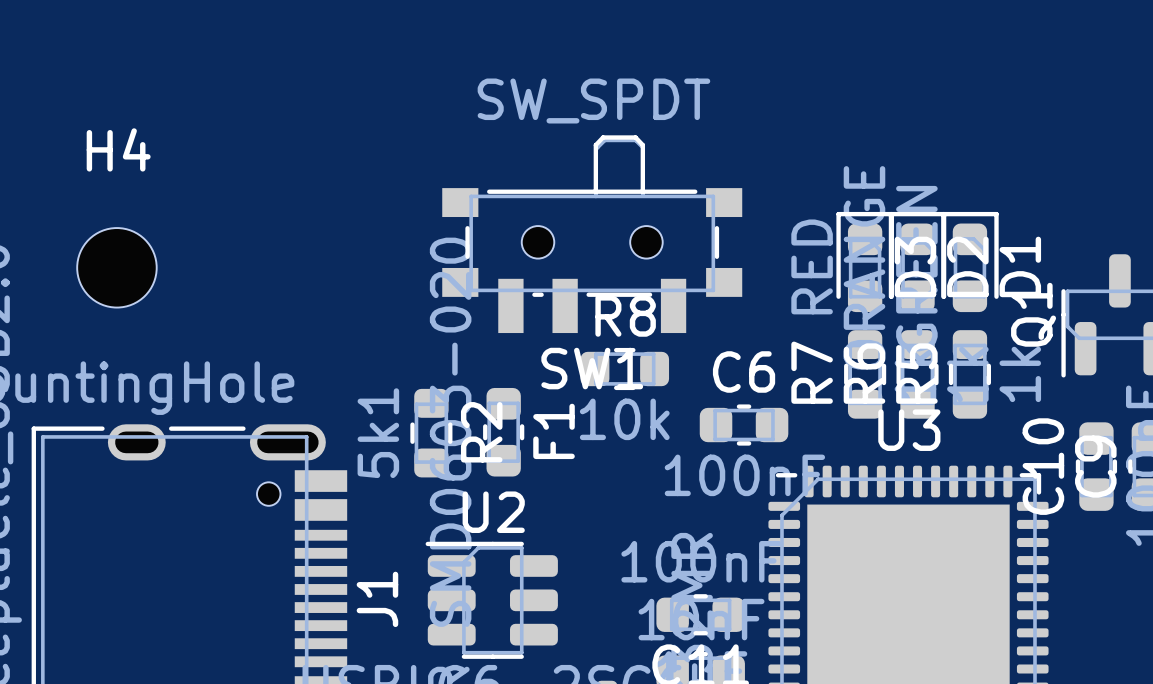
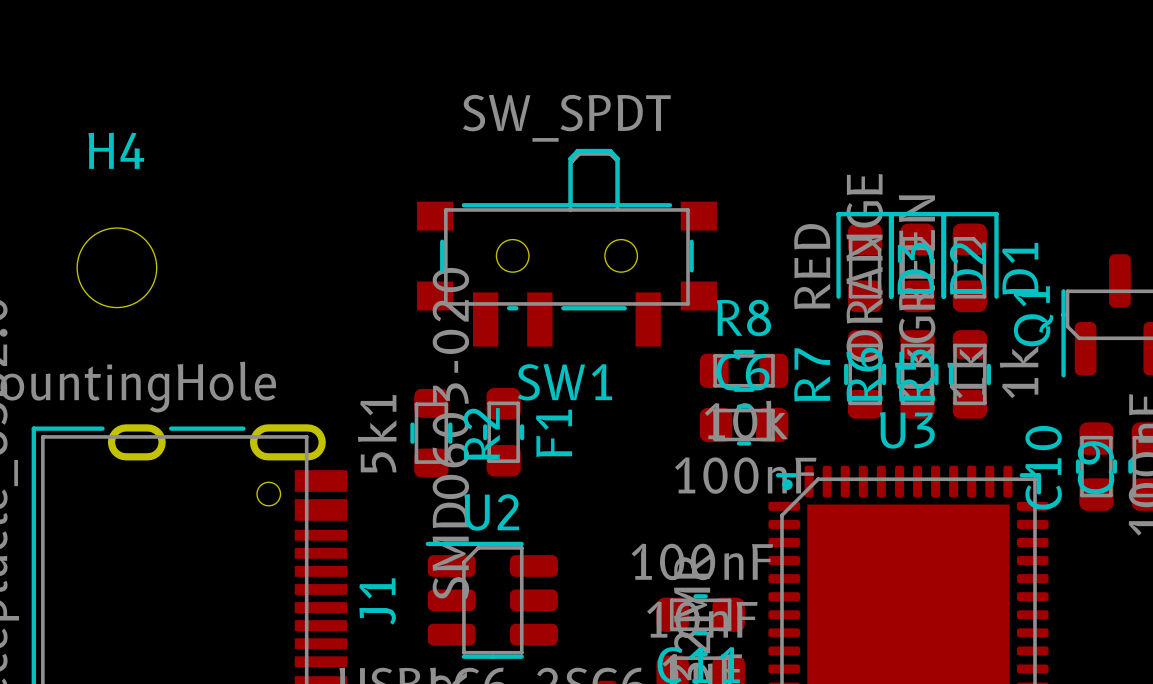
SW1 position: (592, 234) -> (566, 247)
R8 position: (624, 369) -> (744, 370)
drawing: none -> [782, 479, 793, 490]

